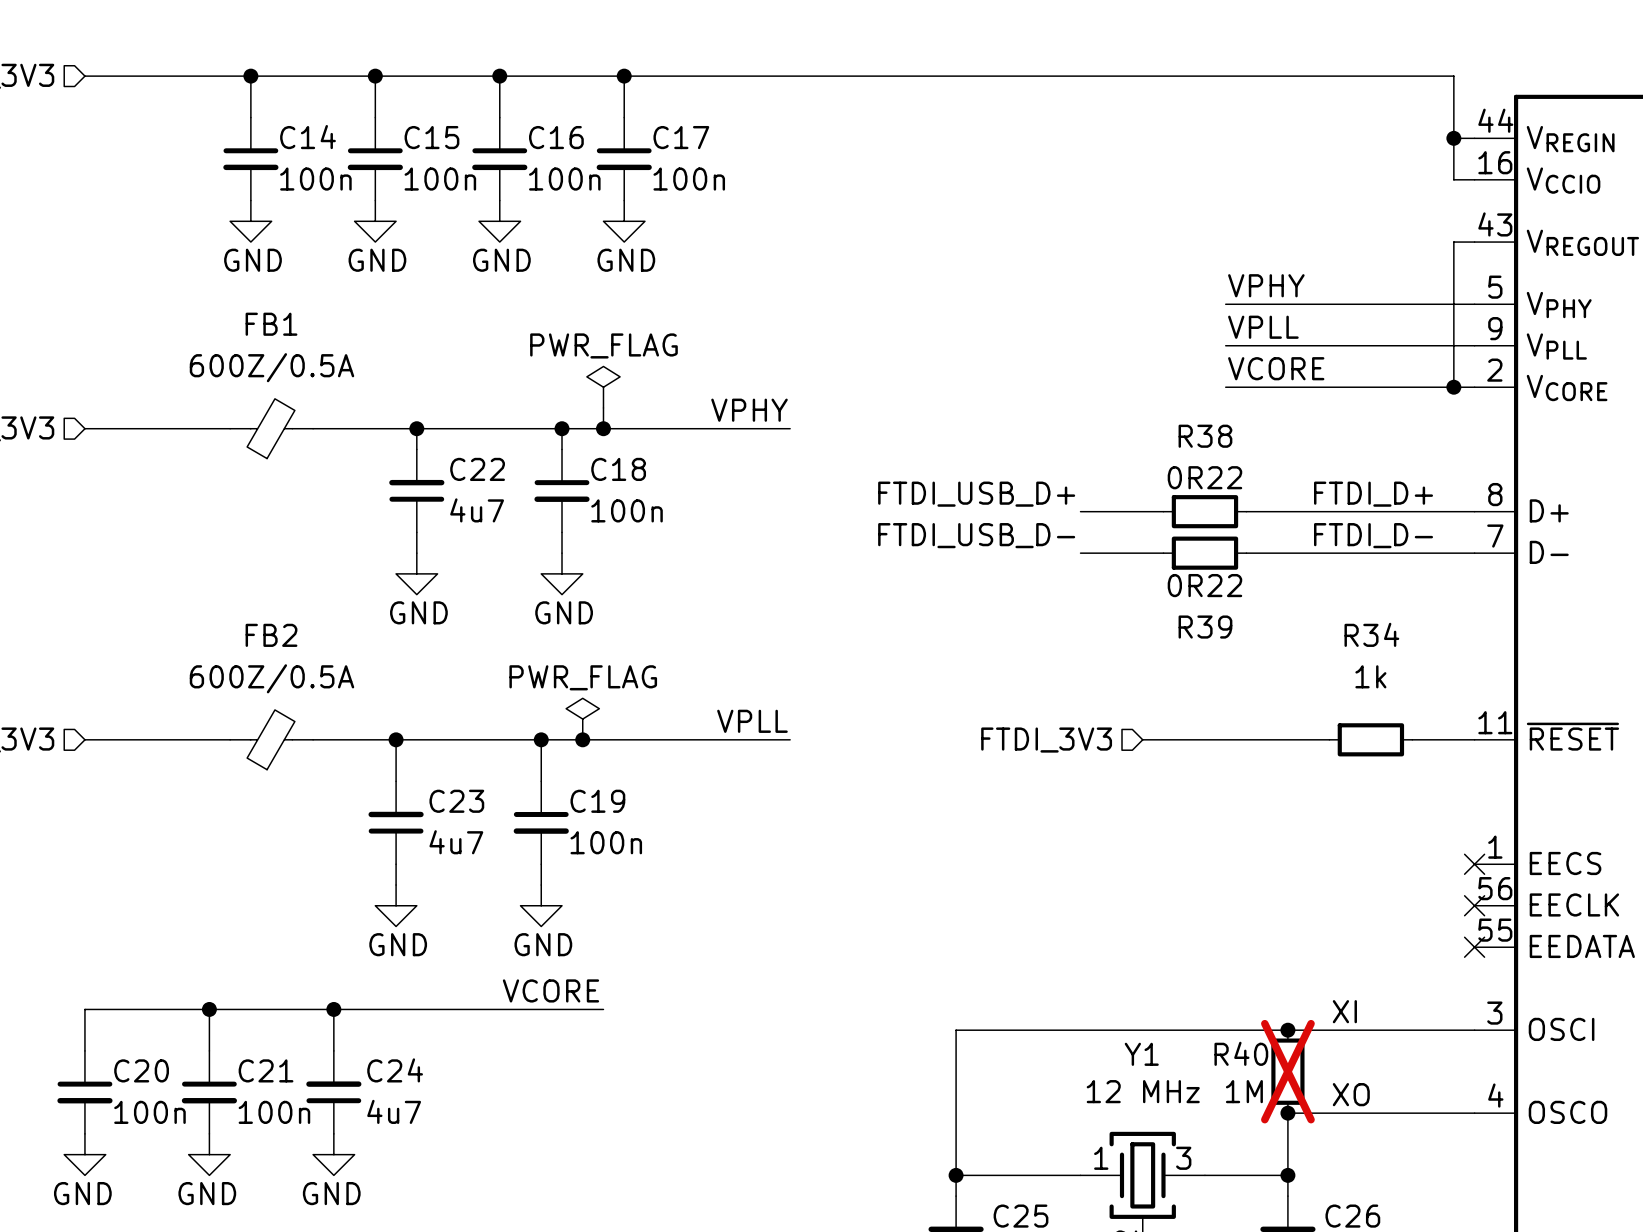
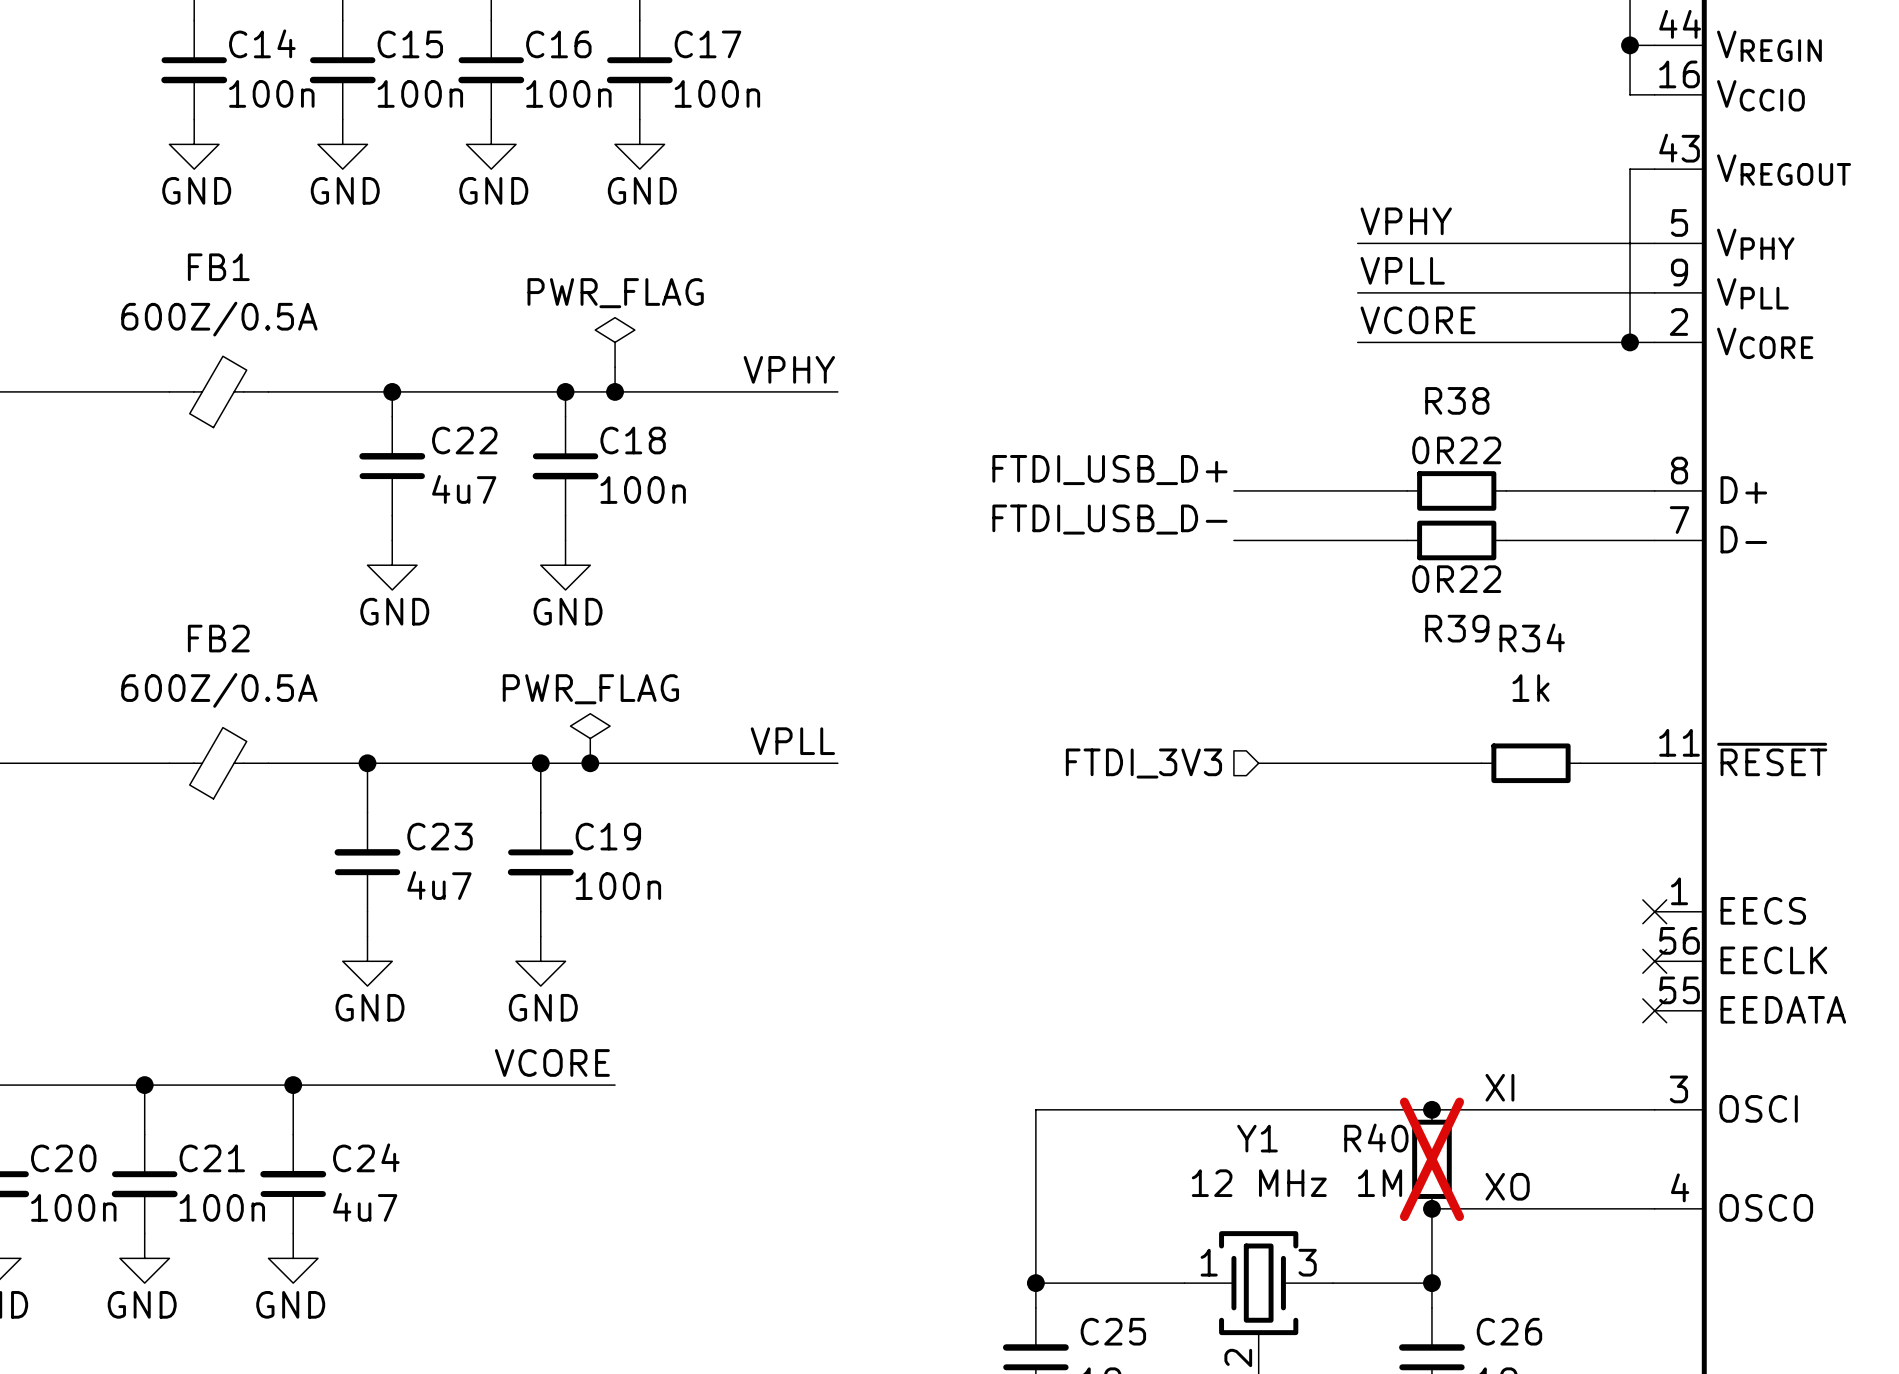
label position: FTDI_USB_D+ (976, 494) -> FTDI_USB_D+ (1109, 470)
label: FTDI_D+ (1373, 494) -> none
wire: (1080, 511) (1122, 511) -> none
R38 position: (1204, 511) -> (1456, 490)
wire: (1267, 511) (1350, 511) -> (1283, 490) (1382, 490)
label position: FTDI_USB_D- (976, 535) -> FTDI_USB_D- (1109, 519)
label: FTDI_D- (1373, 535) -> none
wire: (1080, 553) (1122, 553) -> none
R39 position: (1204, 553) -> (1456, 540)
wire: (1267, 553) (1350, 553) -> (1283, 540) (1382, 540)

